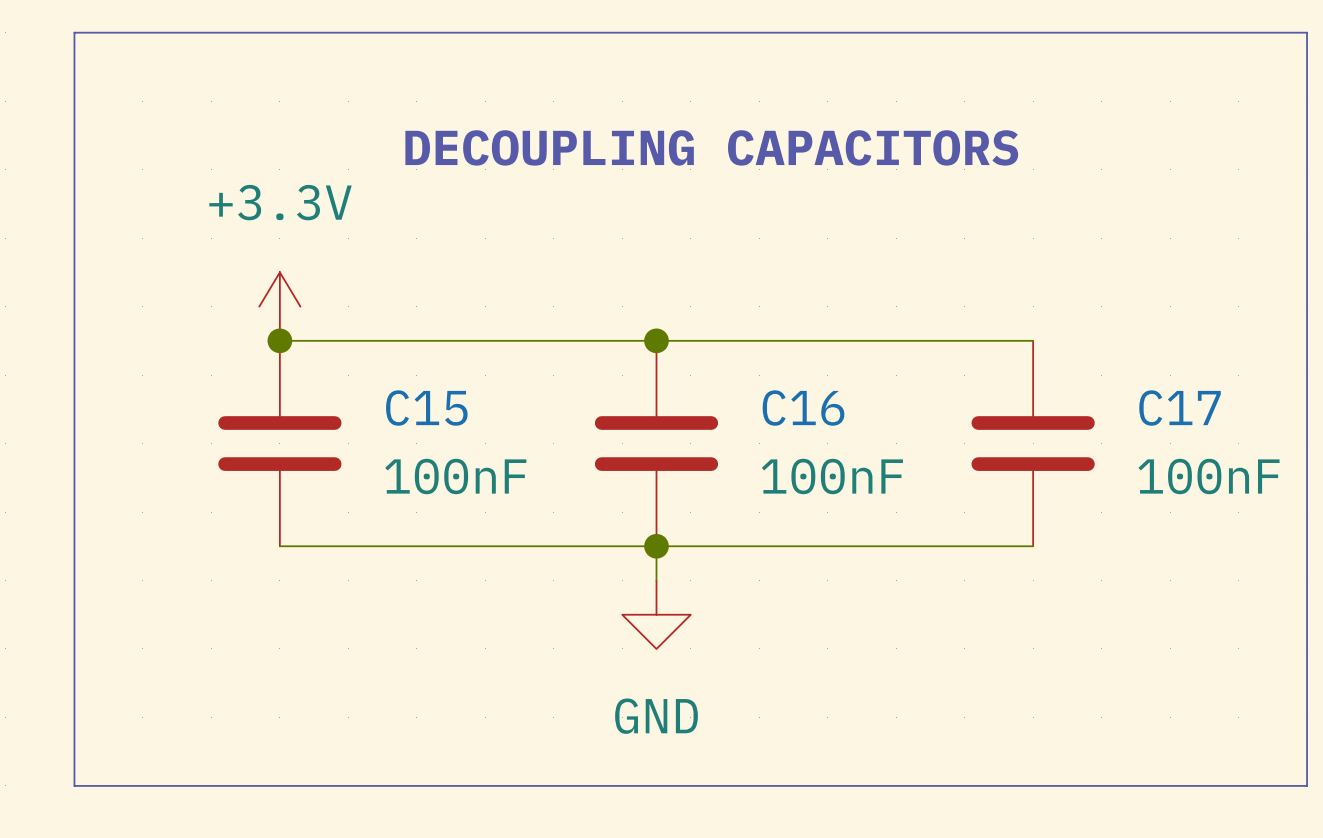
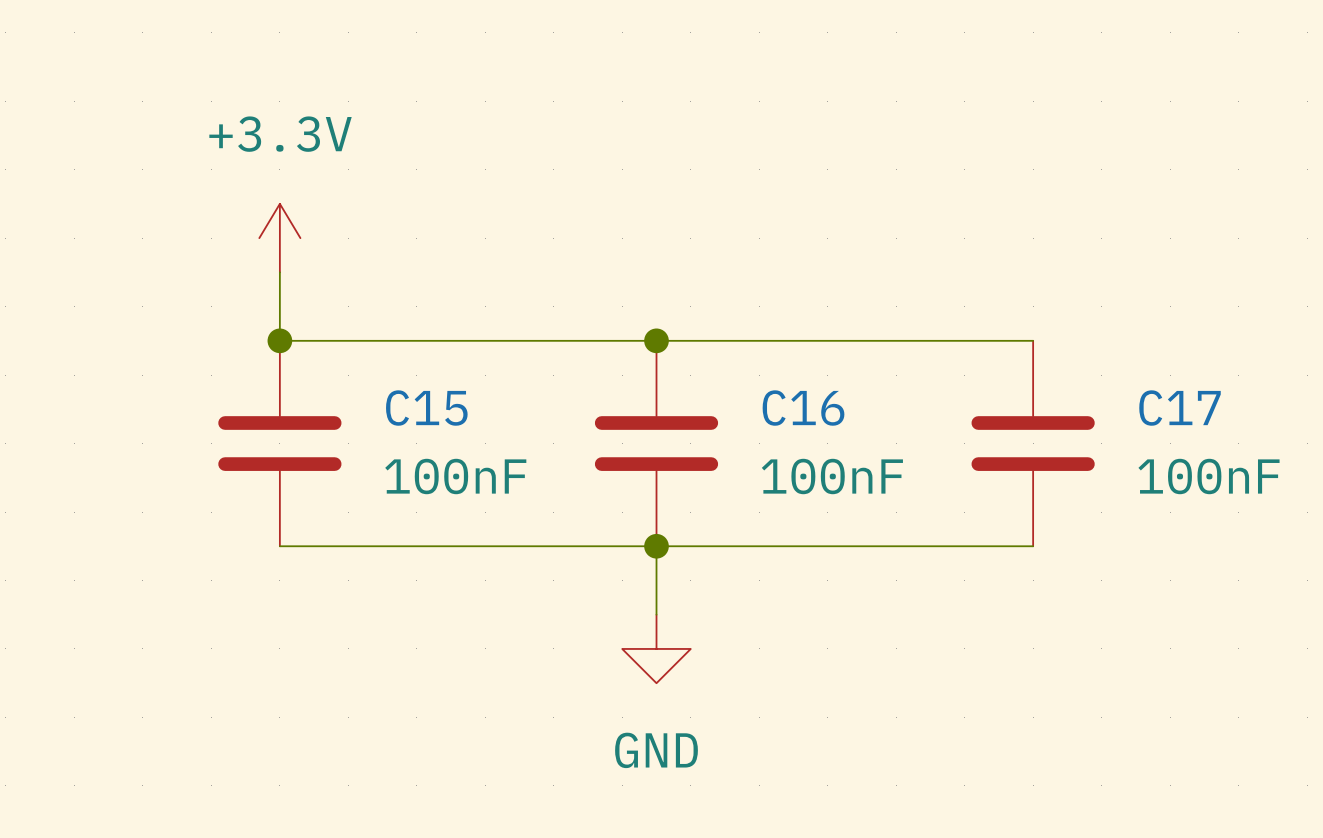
line: (74, 32) (1307, 32) (1307, 785) (74, 785) (74, 32) -> none
text: DECOUPLING CAPACITORS (711, 147) -> none
power symbol position: +3.3V (279, 306) -> +3.3V (279, 238)
power symbol position: GND (656, 614) -> GND (656, 648)

